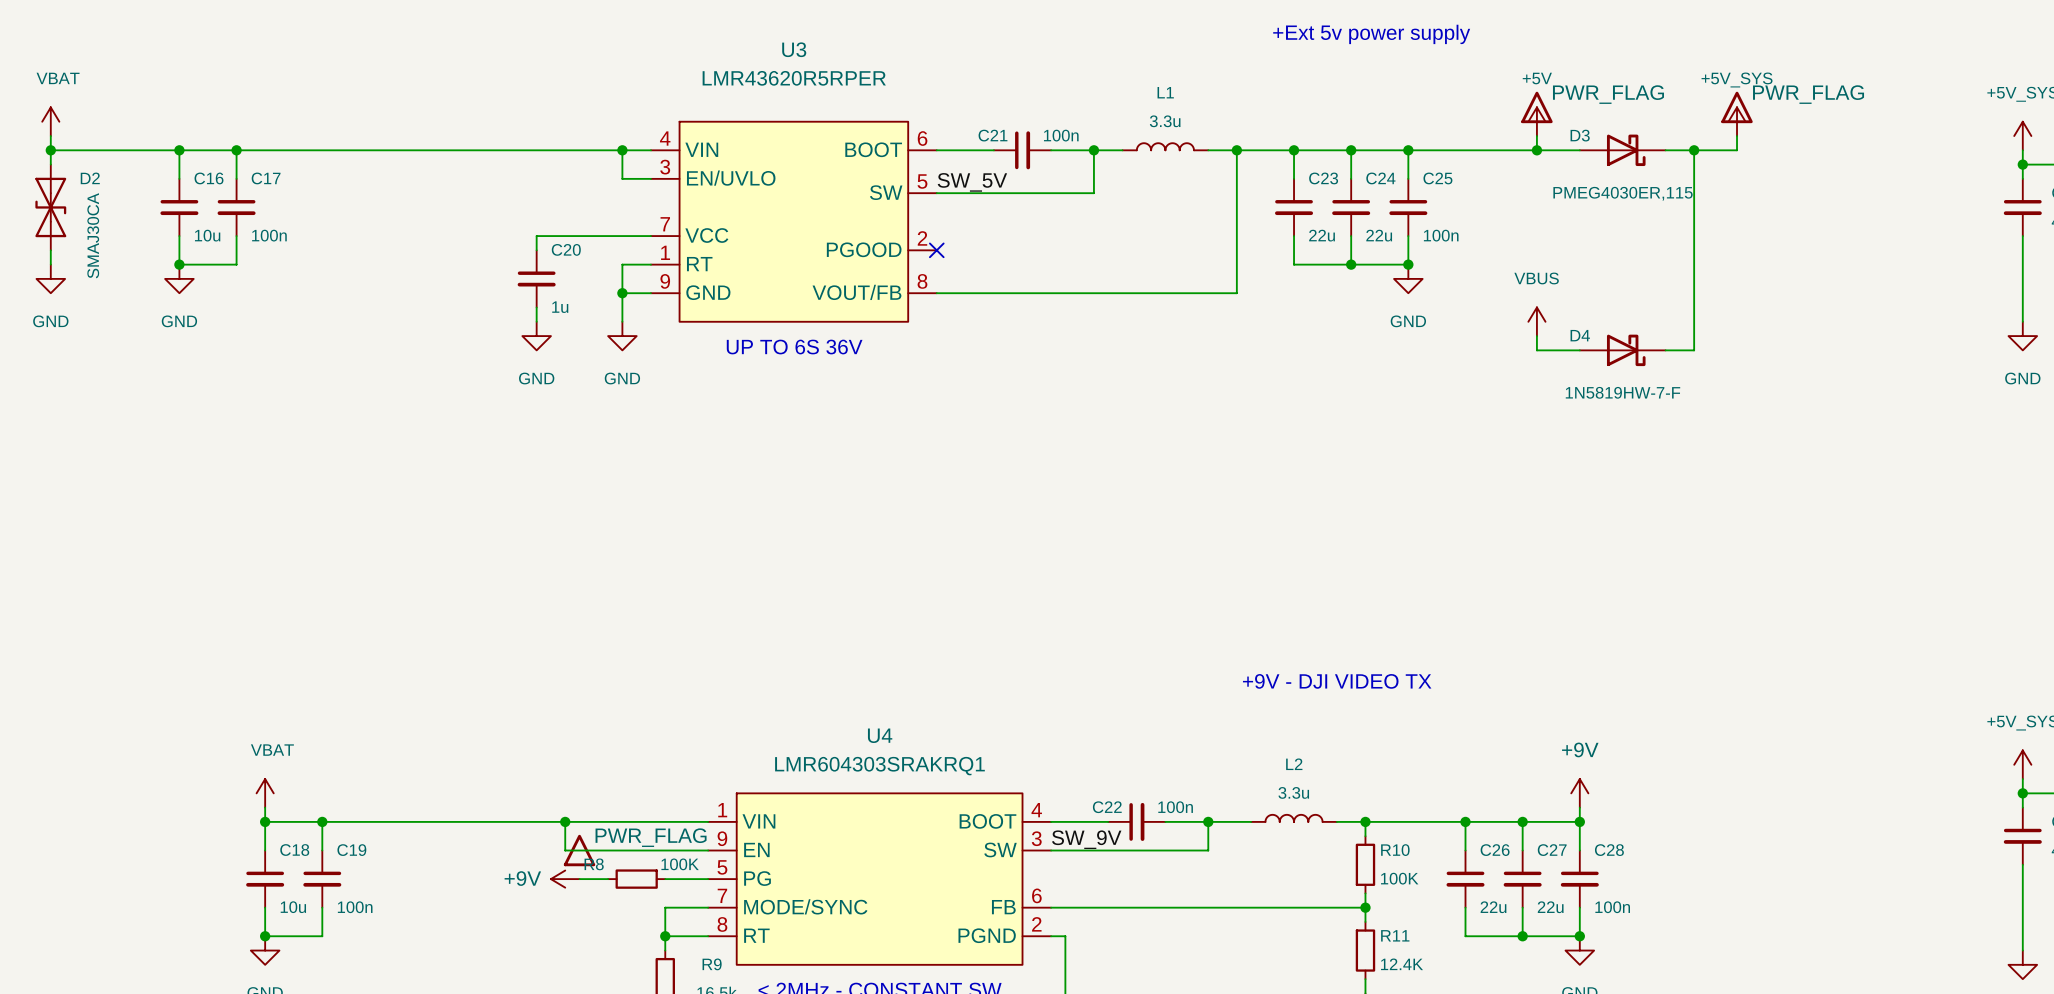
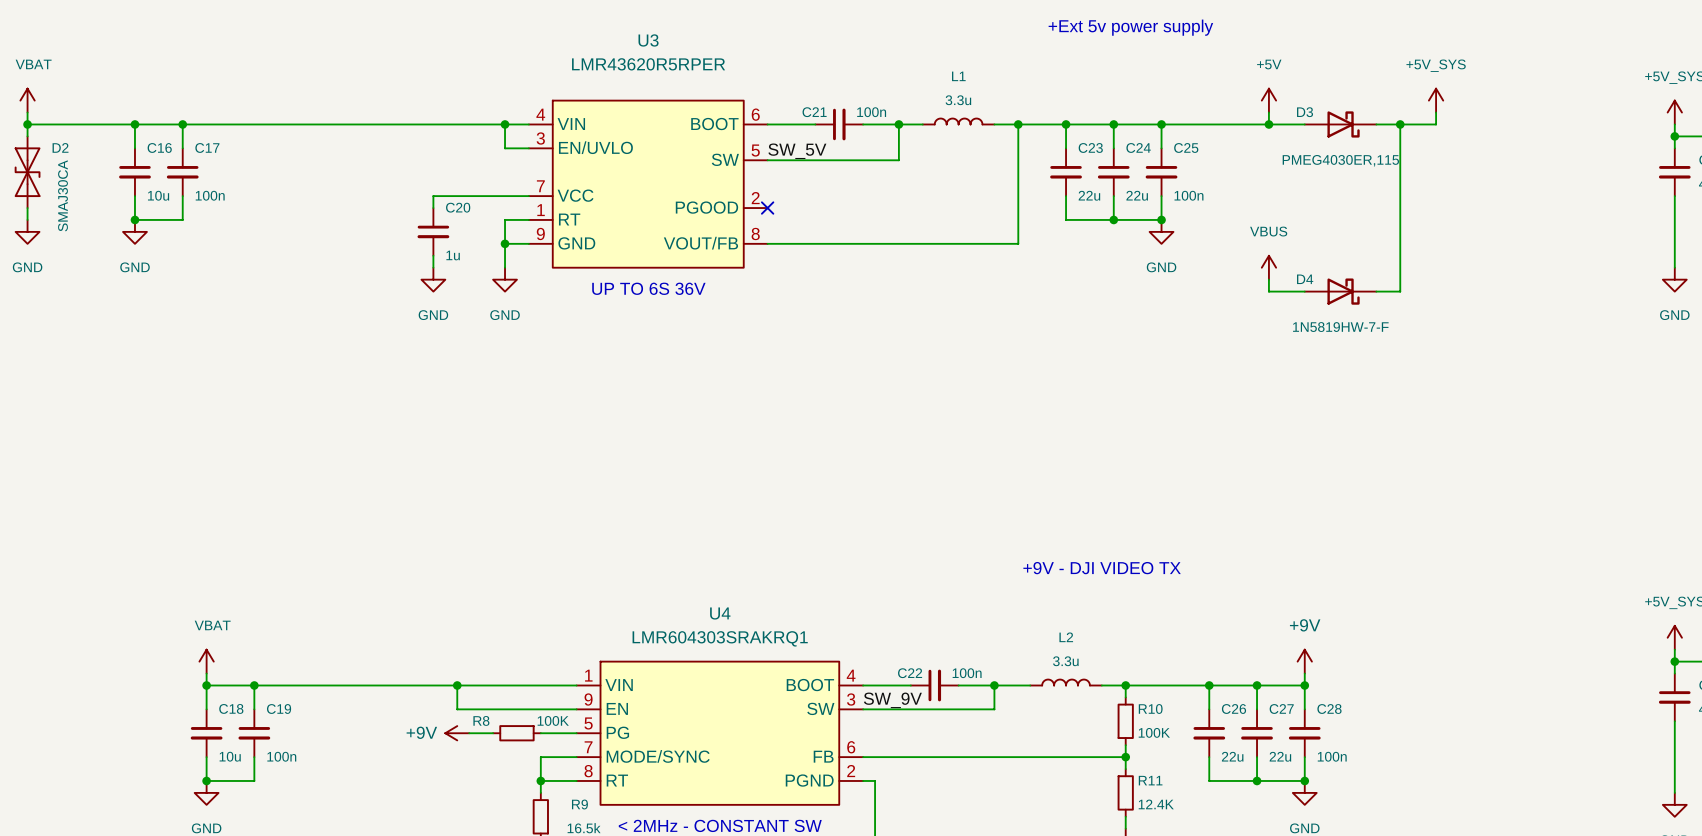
power symbol: PWR_FLAG (1536, 107) -> none
power symbol: PWR_FLAG (1737, 107) -> none
power symbol: PWR_FLAG (579, 850) -> none

